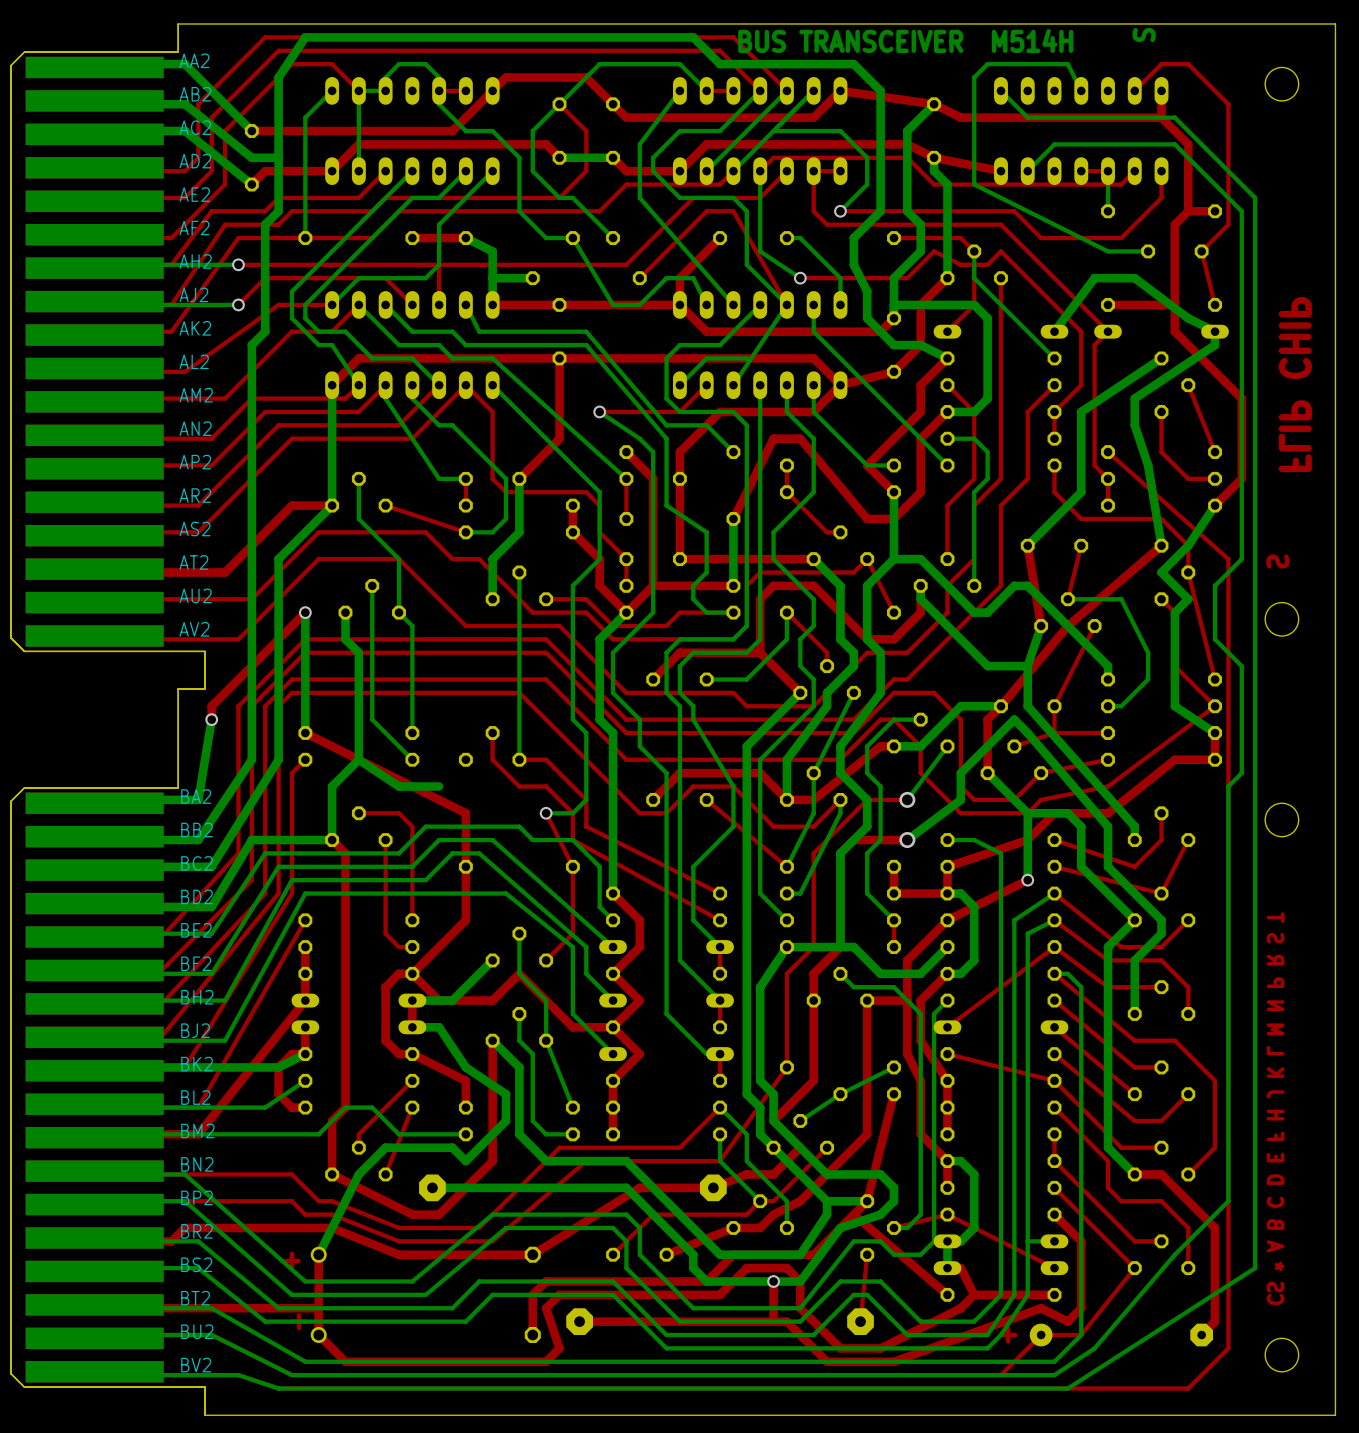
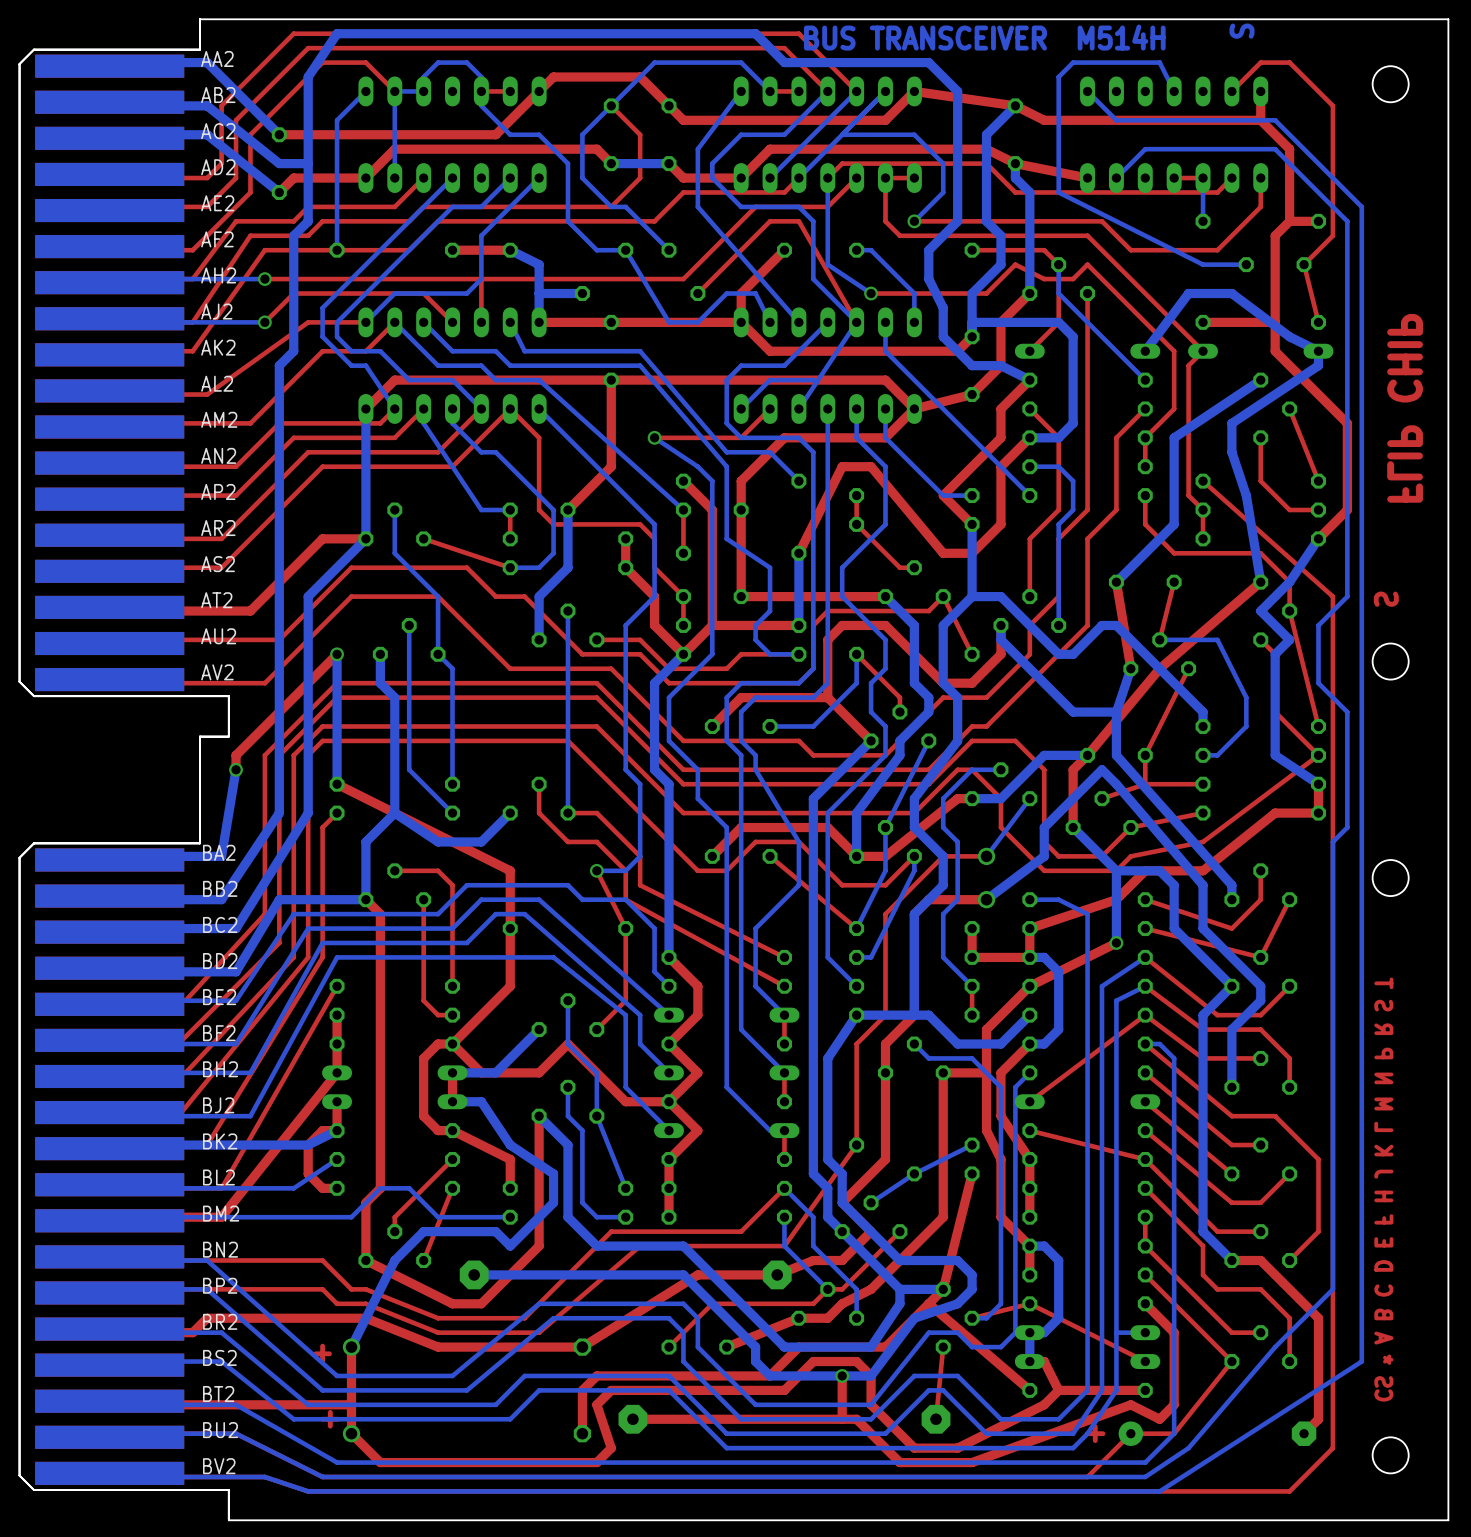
bottom track: none -> (510, 813) (481, 841)

